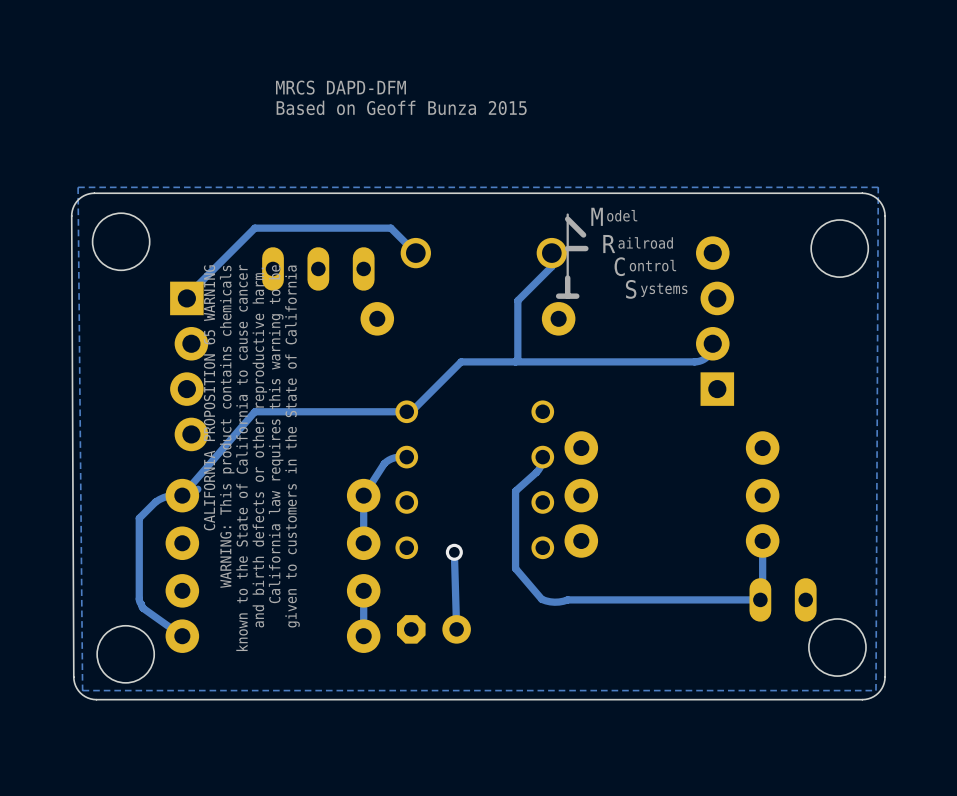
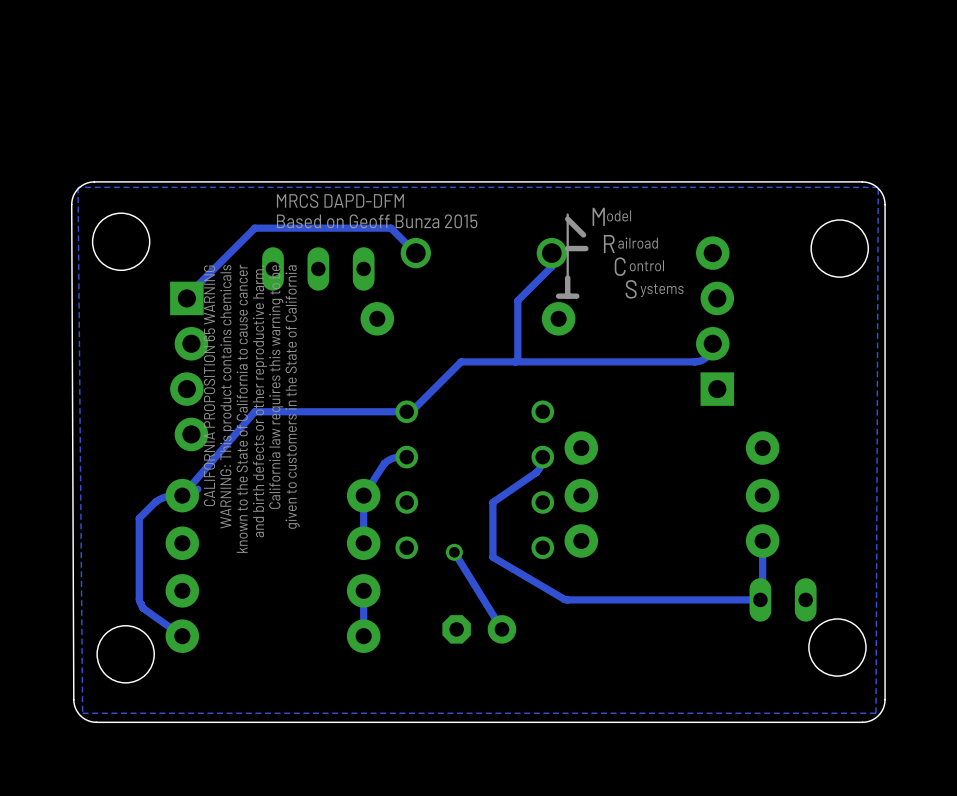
text position: MRCS DAPD-DFM (340, 87) -> MRCS DAPD-DFM (340, 200)
text position: Based on Geoff Bunza 2015 (401, 107) -> Based on Geoff Bunza 2015 (377, 221)
zone outline: (878, 187) (875, 690) (82, 690) (78, 187) -> (878, 187) (875, 713) (82, 713) (78, 187)
board edge: (885, 215) (883, 207) (878, 199) (871, 194) (862, 193) (94, 193) (84, 195) (78, 199) (73, 206) (71, 216) (73, 677) (76, 688) (85, 696) (96, 699) (862, 699) (871, 697) (878, 693) (883, 685) (885, 676) -> (885, 215) (884, 201) (882, 193) (873, 184) (862, 181) (94, 181) (84, 184) (78, 188) (73, 194) (71, 204) (73, 699) (76, 711) (85, 719) (96, 722) (862, 722) (873, 719) (882, 710) (884, 702) (885, 676)
track: (536, 472) (515, 491) (515, 568) (541, 599) (554, 602) (567, 599) -> (536, 472) (492, 502) (492, 557) (567, 599)
track: (454, 552) (456, 629) -> (454, 552) (501, 629)
part position: (433, 629) -> (479, 629)

